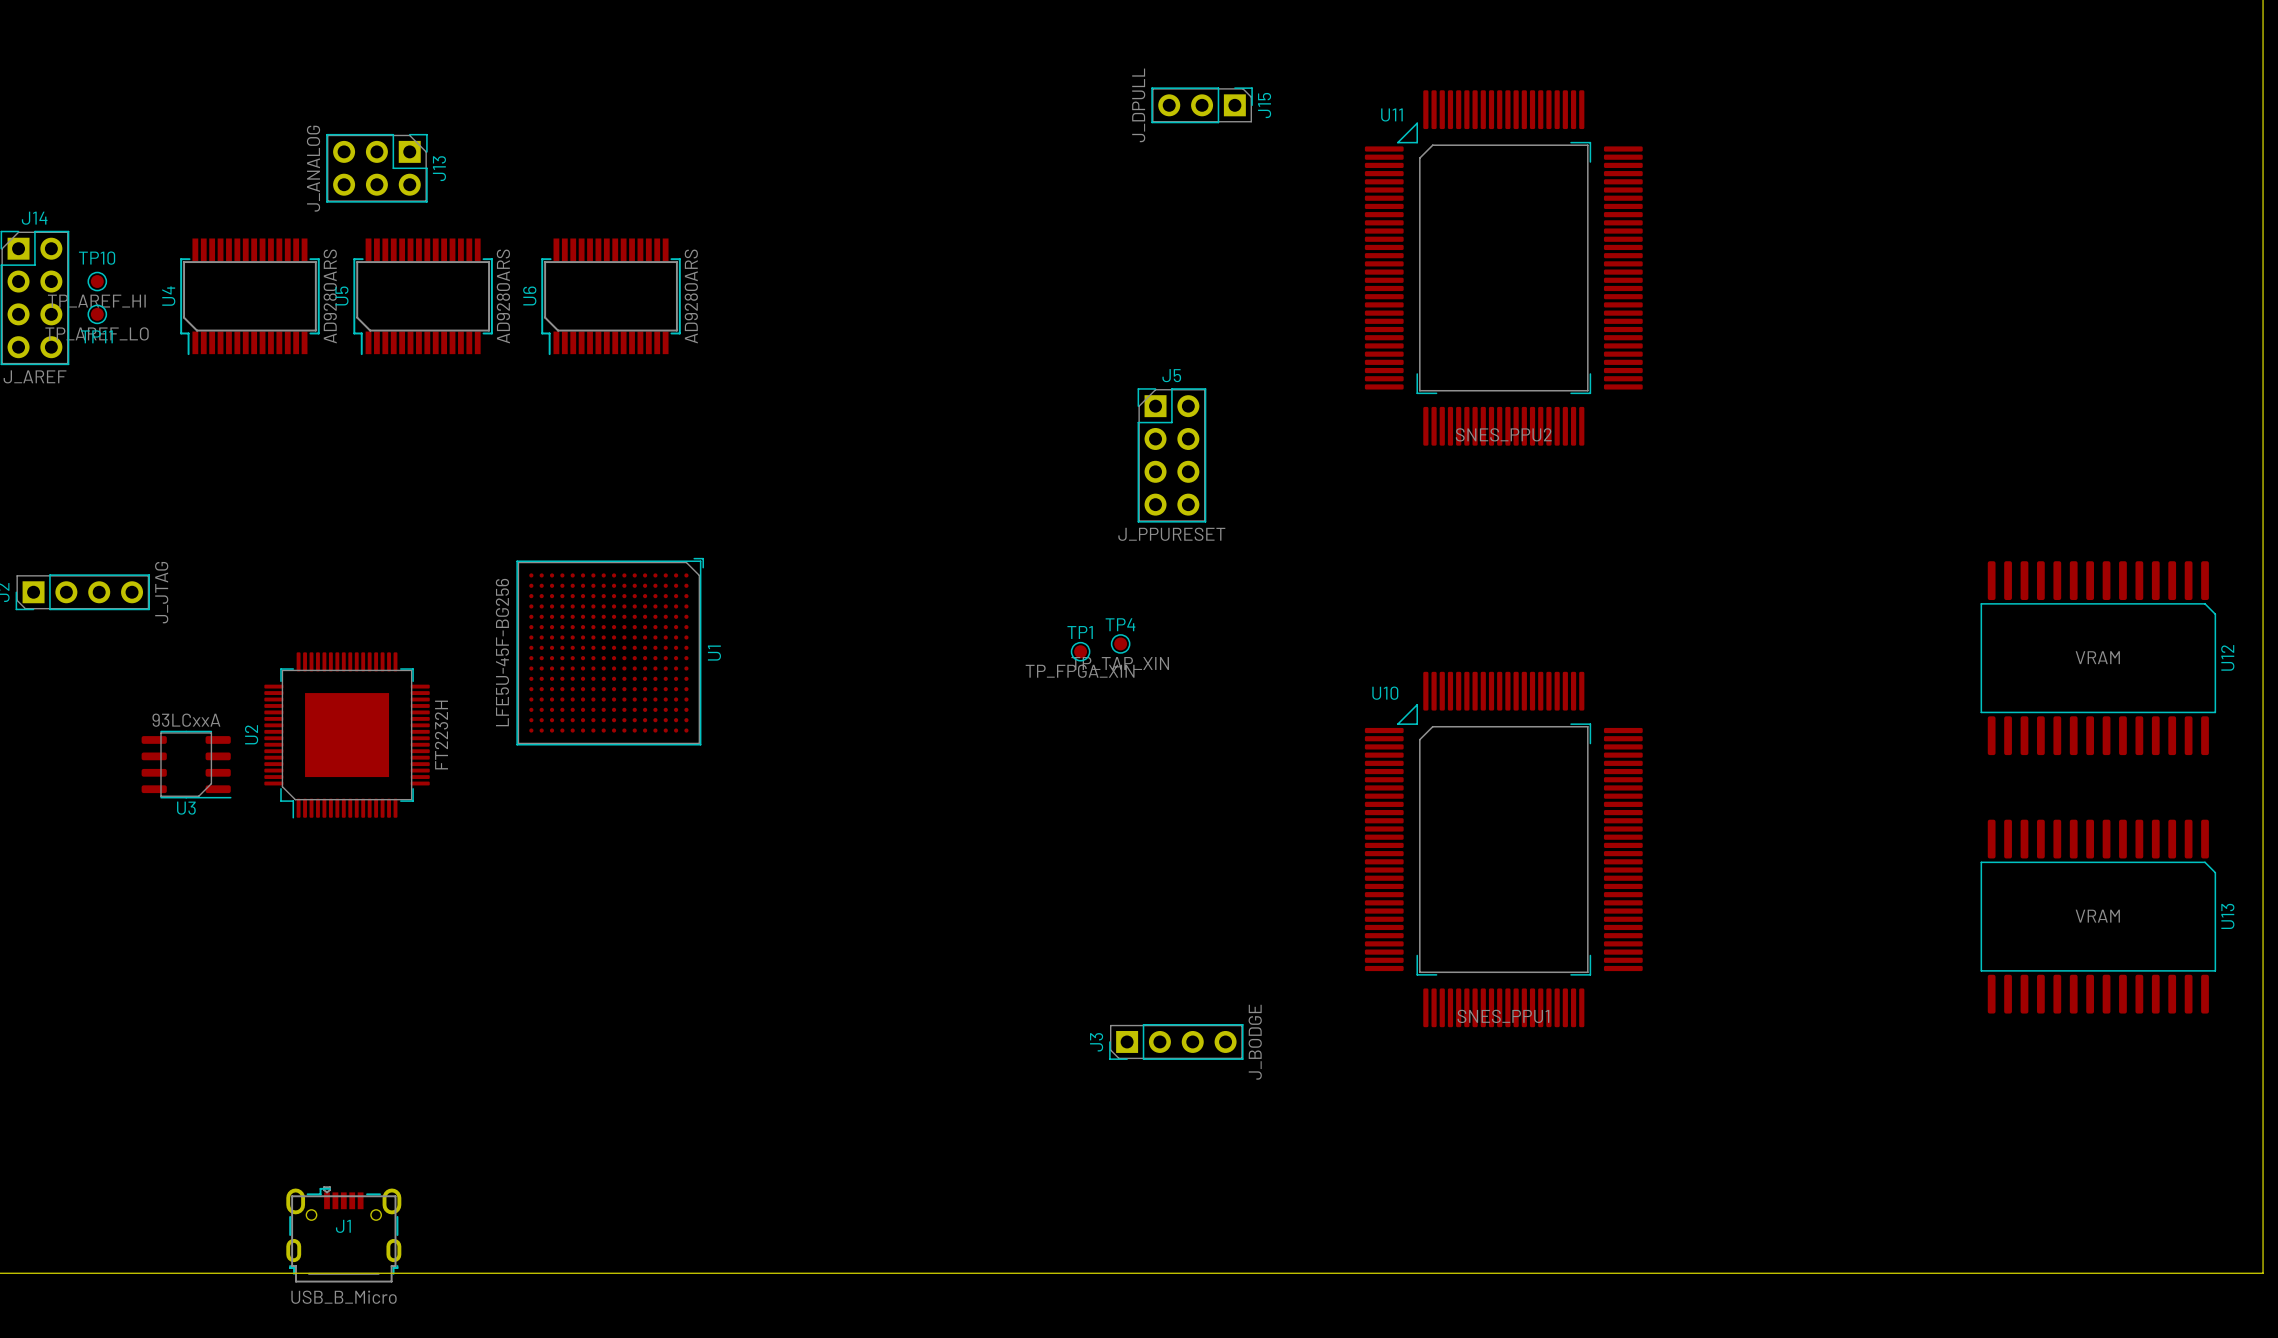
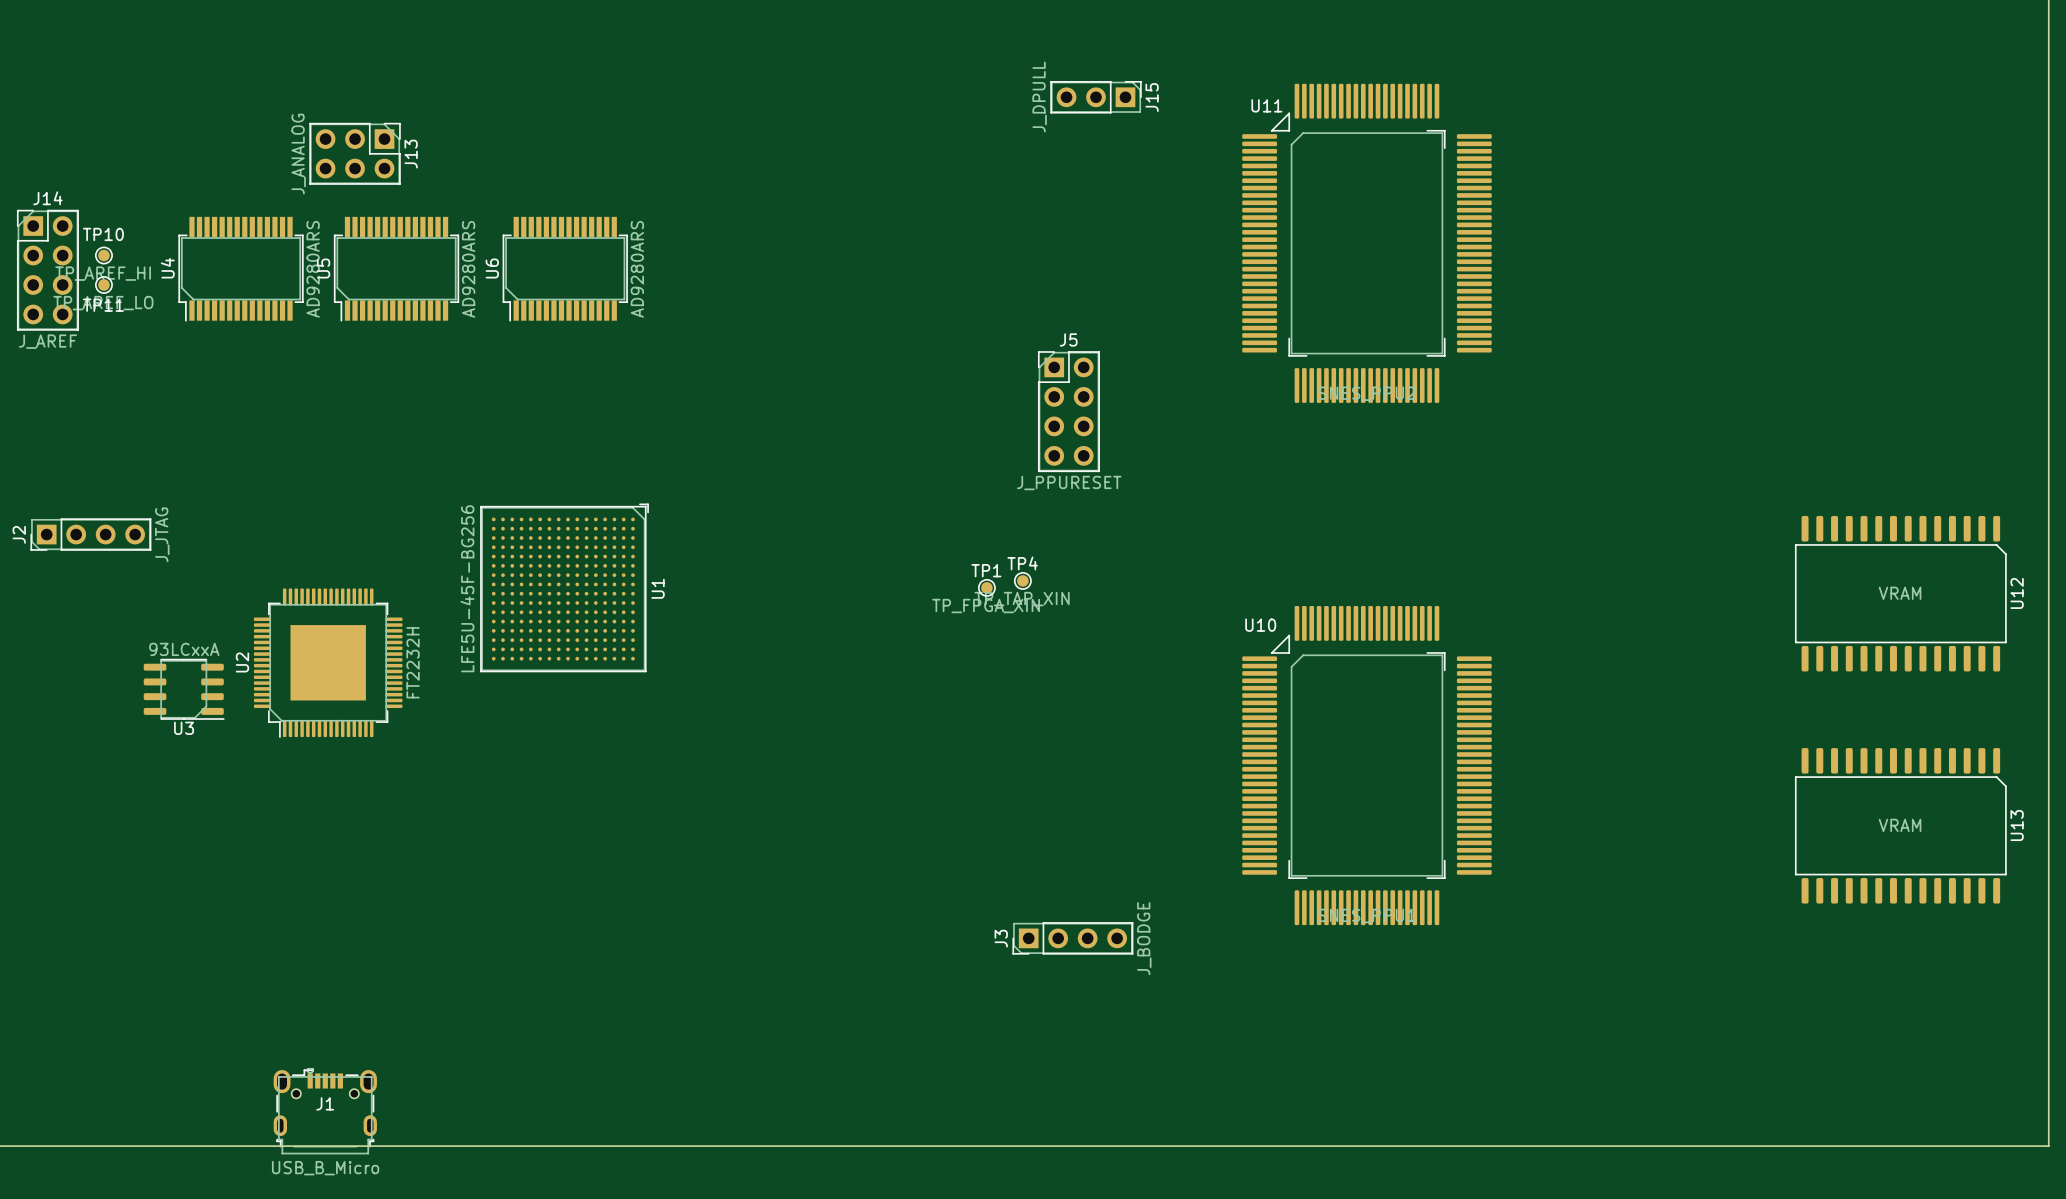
U12 footprint: [1980, 561, 2217, 756] -> [1795, 515, 2007, 672]
U13 footprint: [1980, 819, 2217, 1014] -> [1795, 748, 2007, 904]

